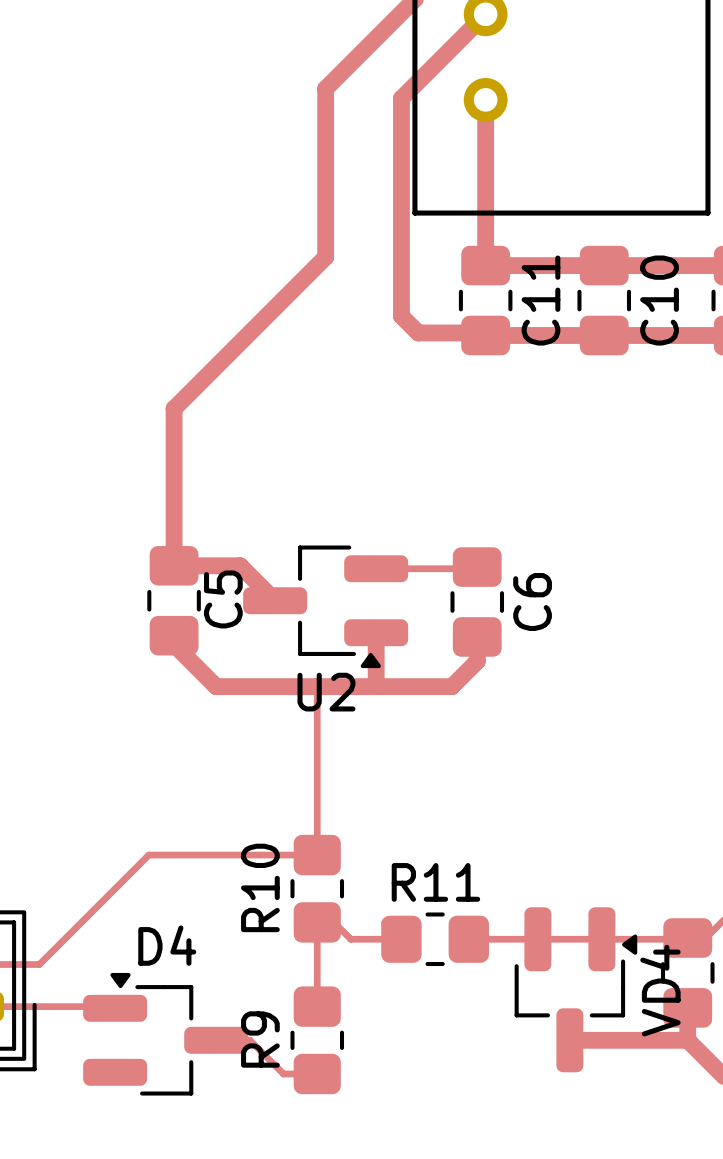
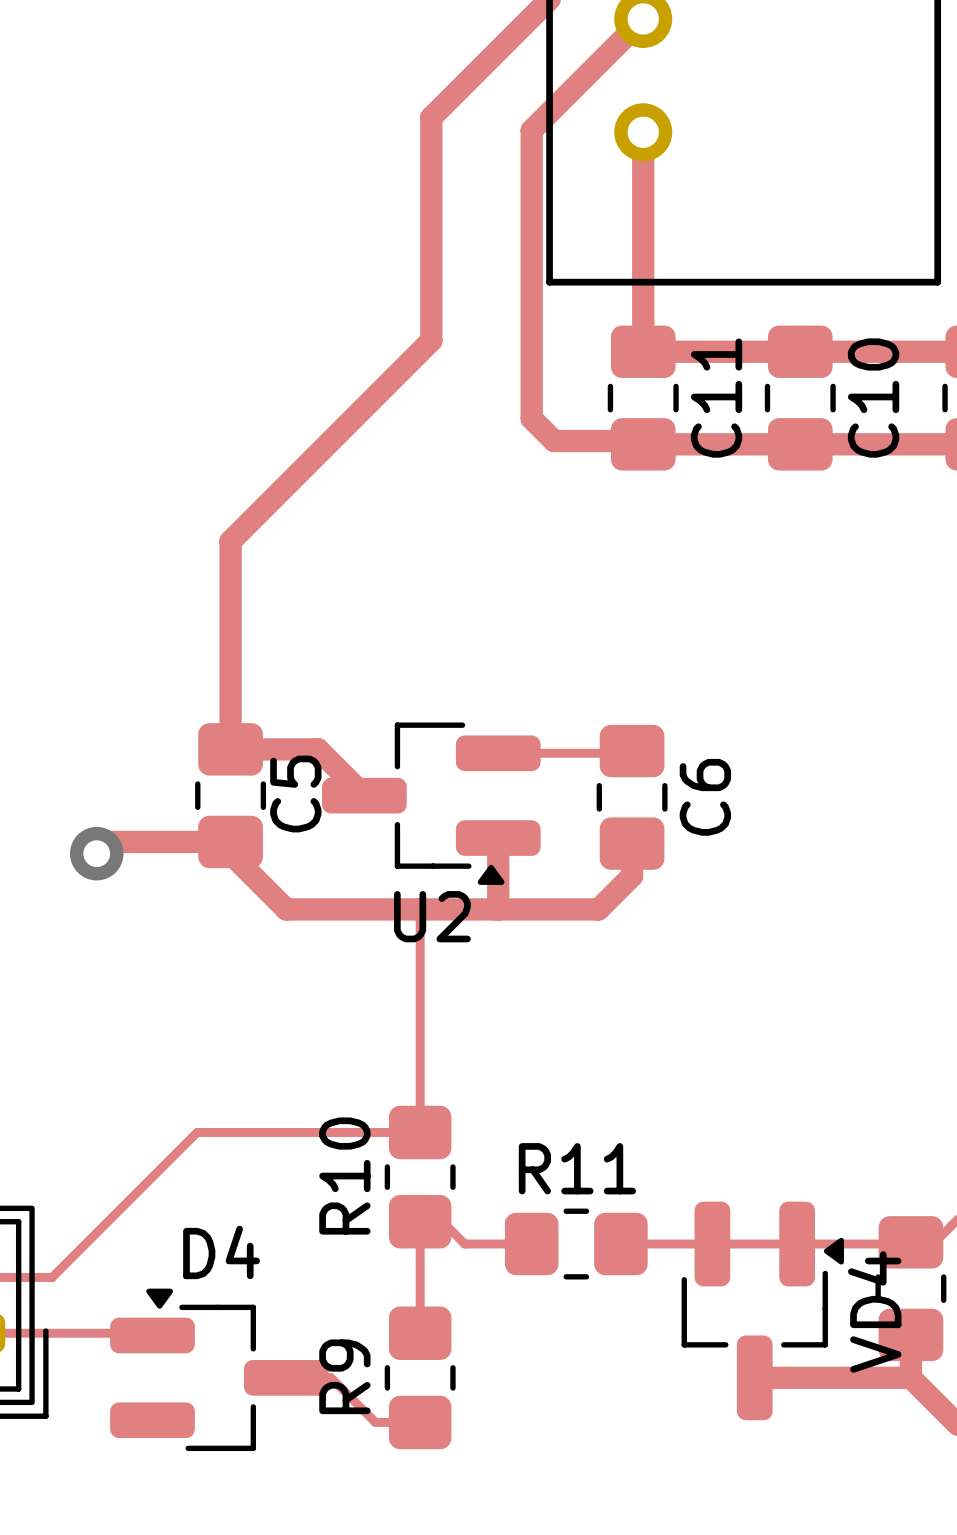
top track: none -> (230, 841) (108, 841) (96, 853)
via: none -> (96, 853)

